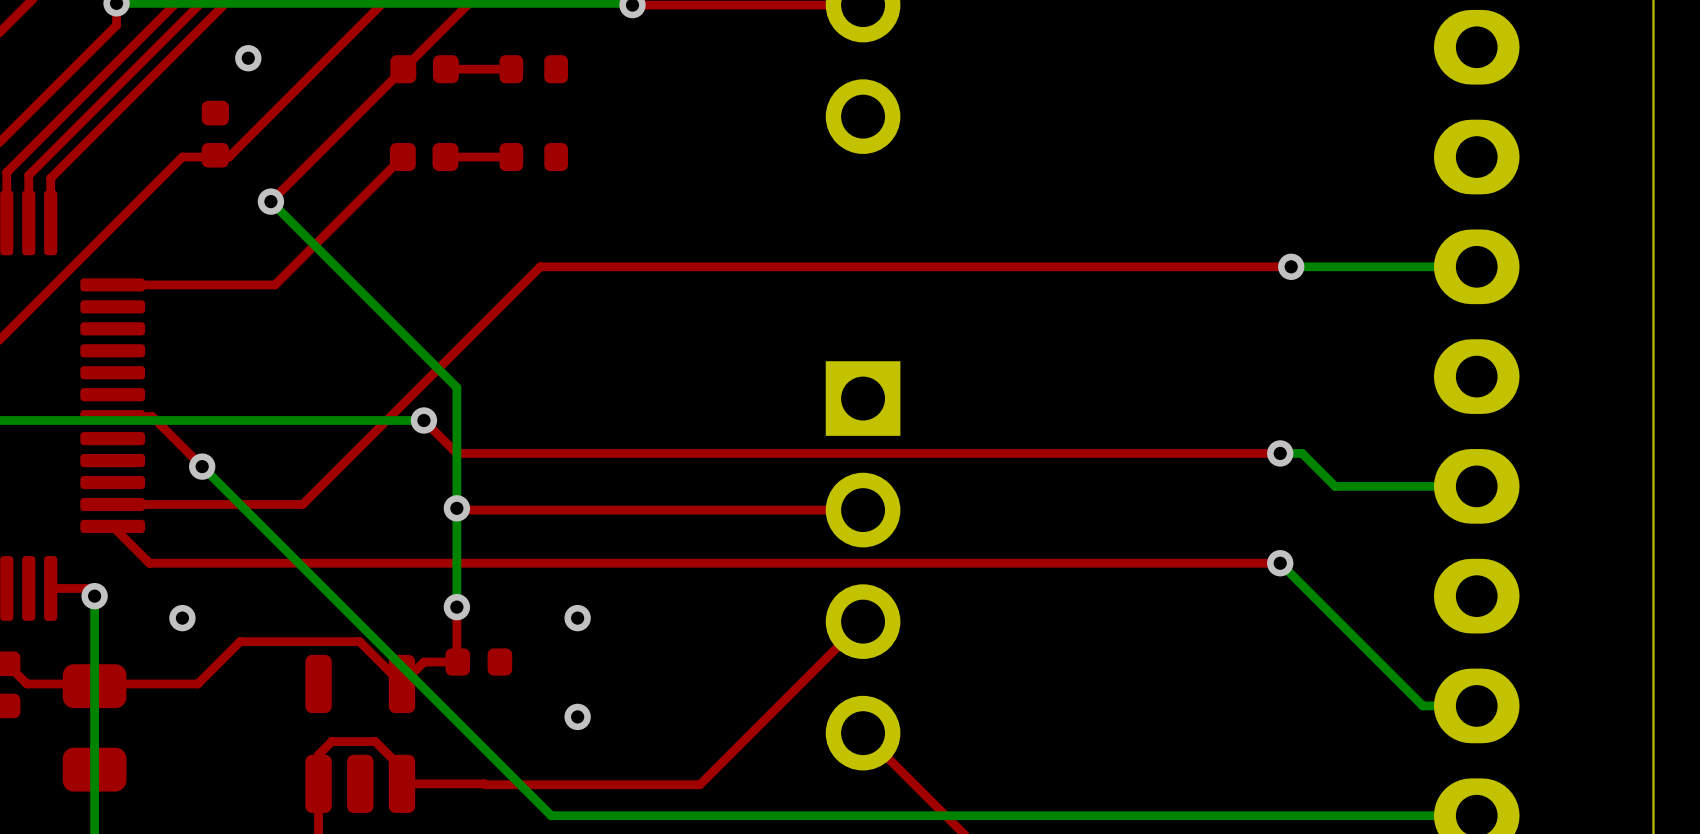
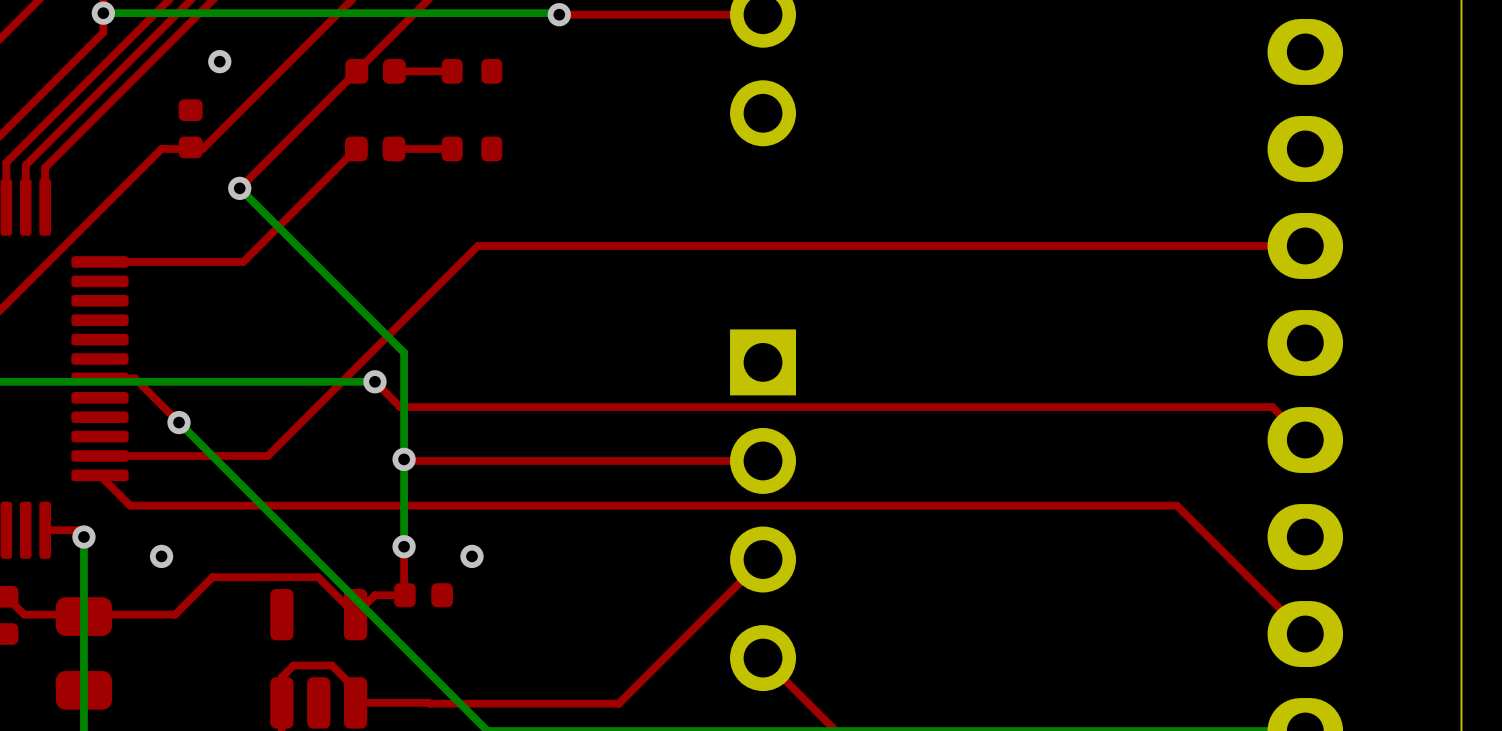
via: (1291, 266) -> none
top track: none -> (1305, 245) (1141, 245)
bottom track: (1476, 266) (1291, 266) -> none
top track: (452, 449) (456, 453) (1280, 453) -> (400, 407) (1272, 407) (1305, 440)
bottom track: (1280, 453) (1302, 453) (1335, 486) (1476, 486) -> none
via: (1280, 453) -> none
top track: (146, 560) (149, 563) (1280, 563) -> (130, 505) (1176, 505) (1305, 634)
bottom track: (1280, 563) (1422, 705) (1476, 705) -> none
via: (1280, 563) -> none
via position: (577, 618) -> (471, 556)
via: (577, 716) -> none

